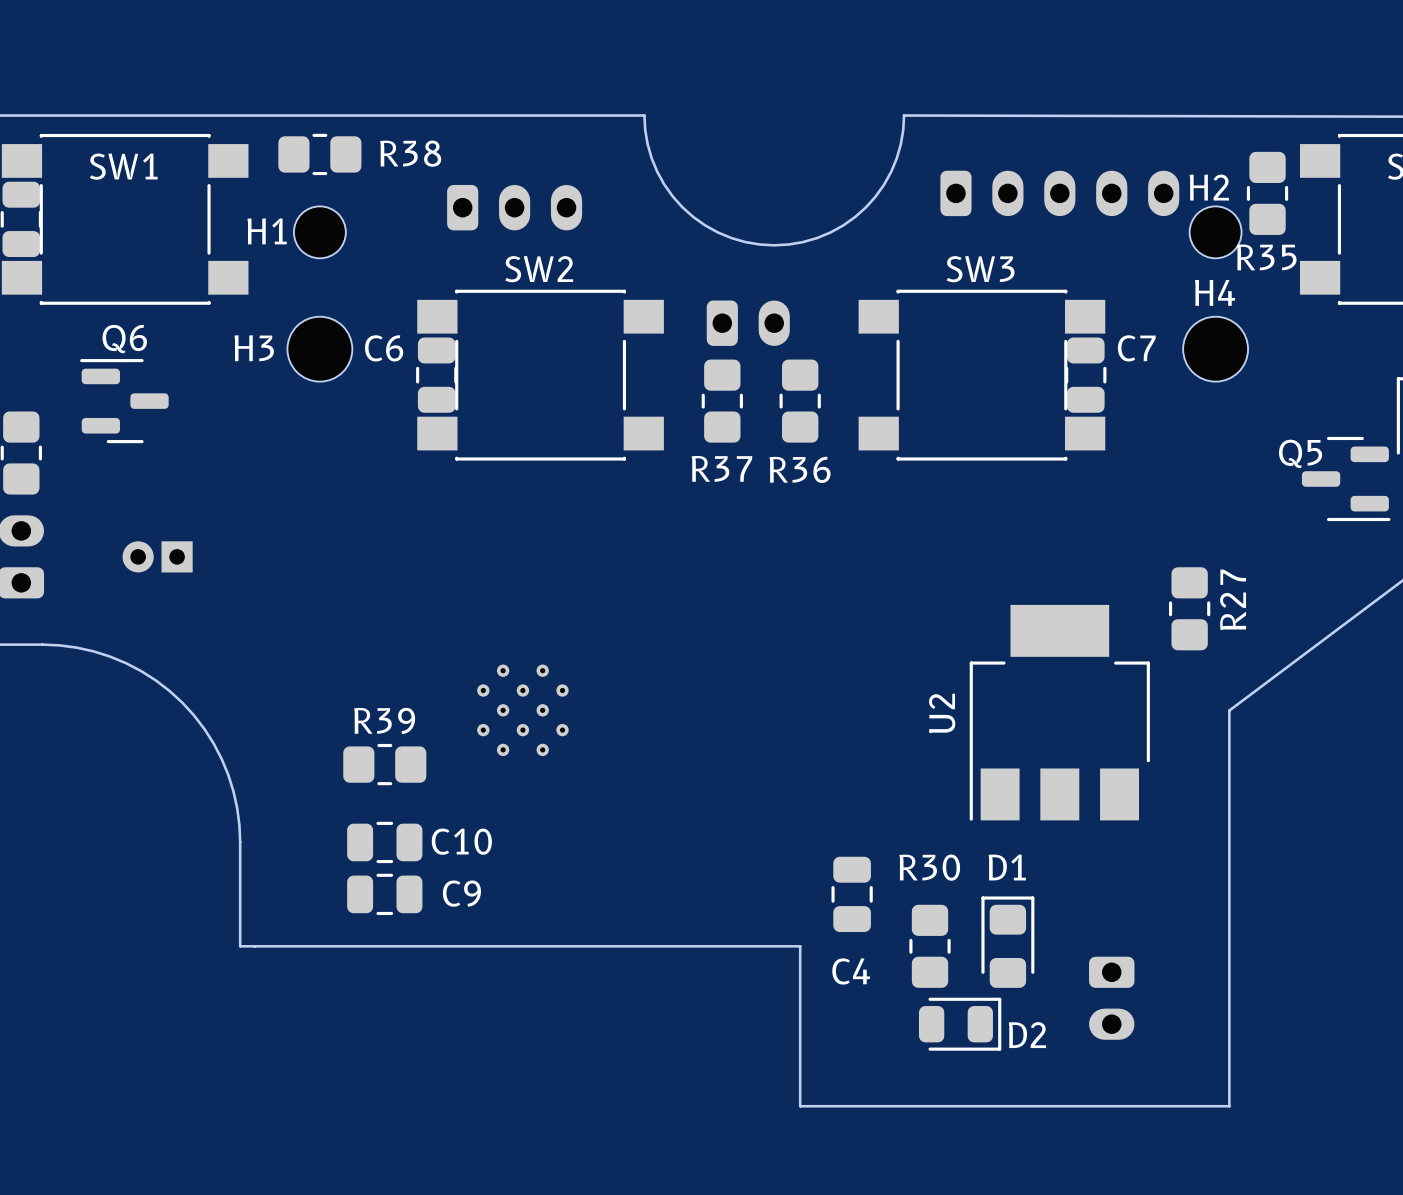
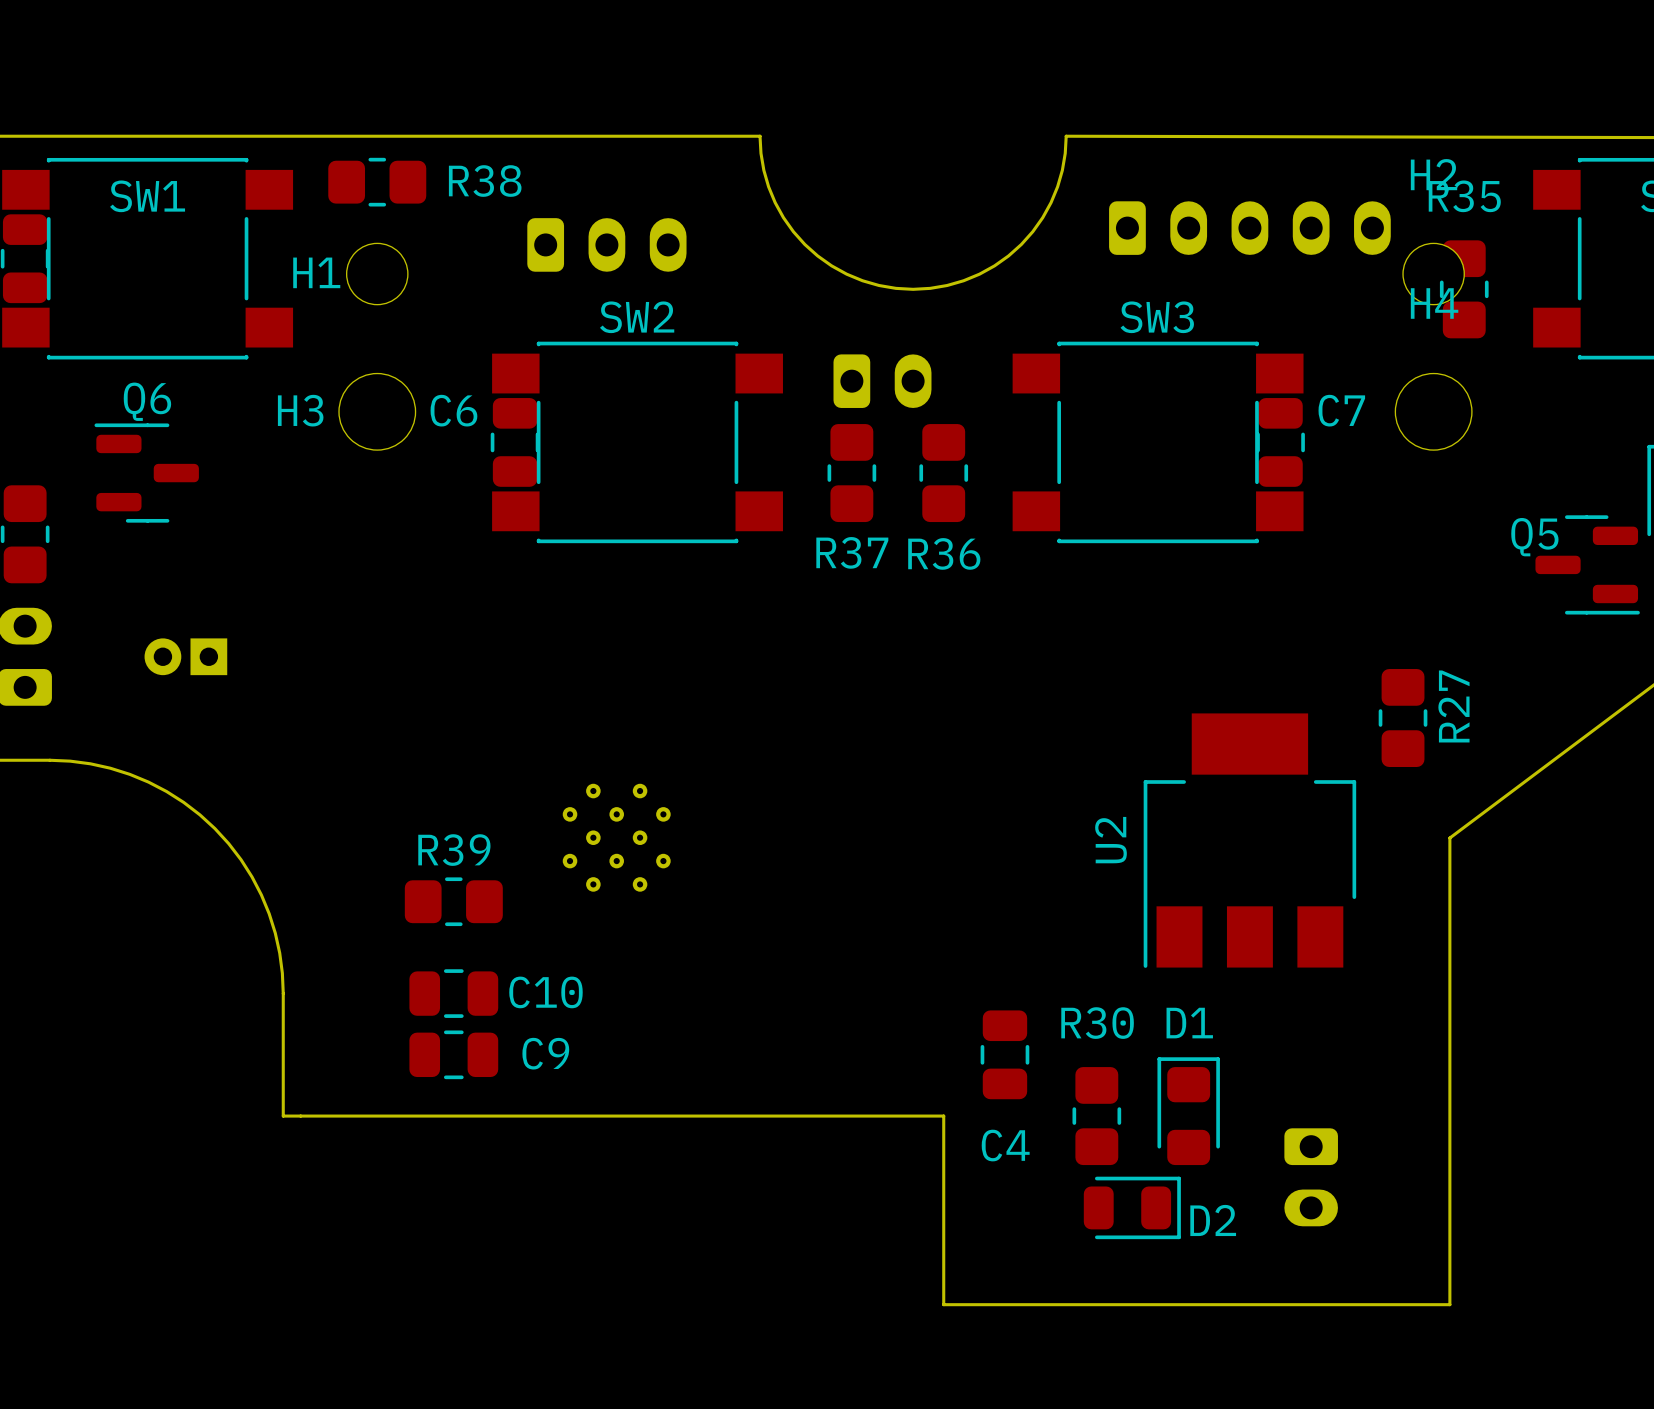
H2 name position: H2 (1209, 187) -> H2 (1434, 174)
R35 position: (1267, 193) -> (1464, 289)
R35 name position: R35 (1266, 257) -> R35 (1464, 196)
H4 name position: H4 (1215, 292) -> H4 (1434, 303)

